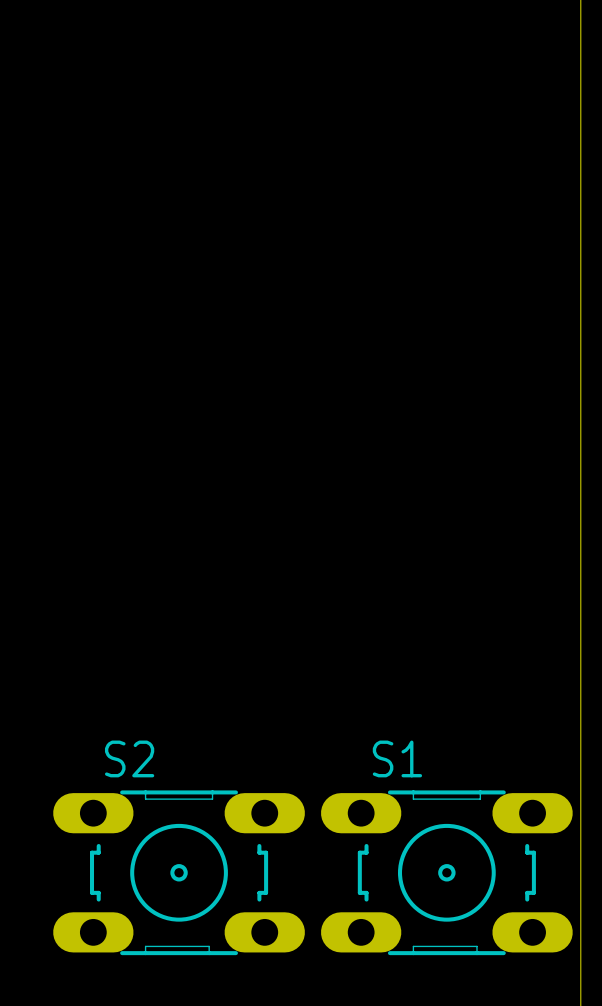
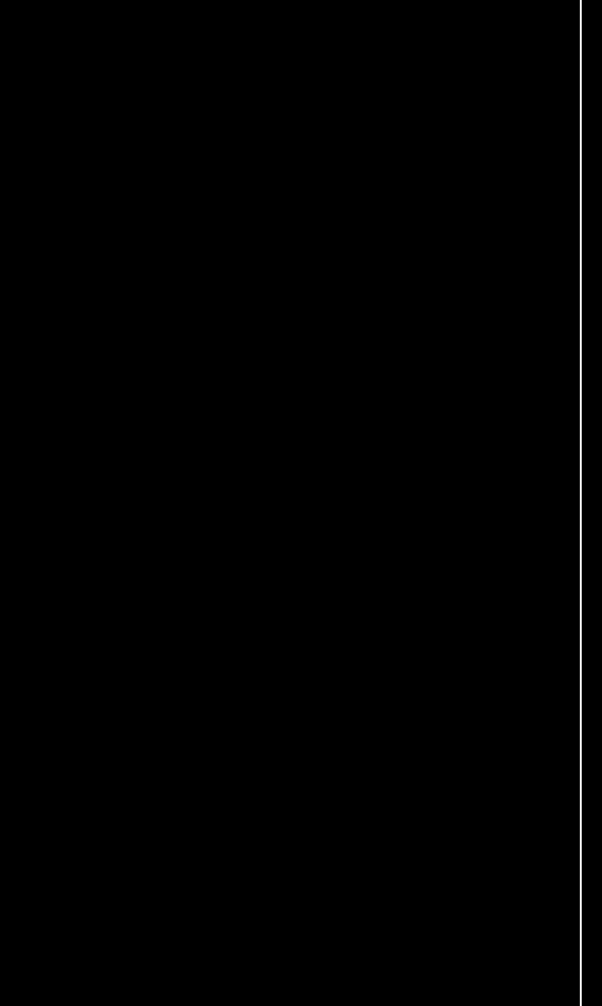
S2: (179, 872) -> none
S1: (446, 872) -> none

